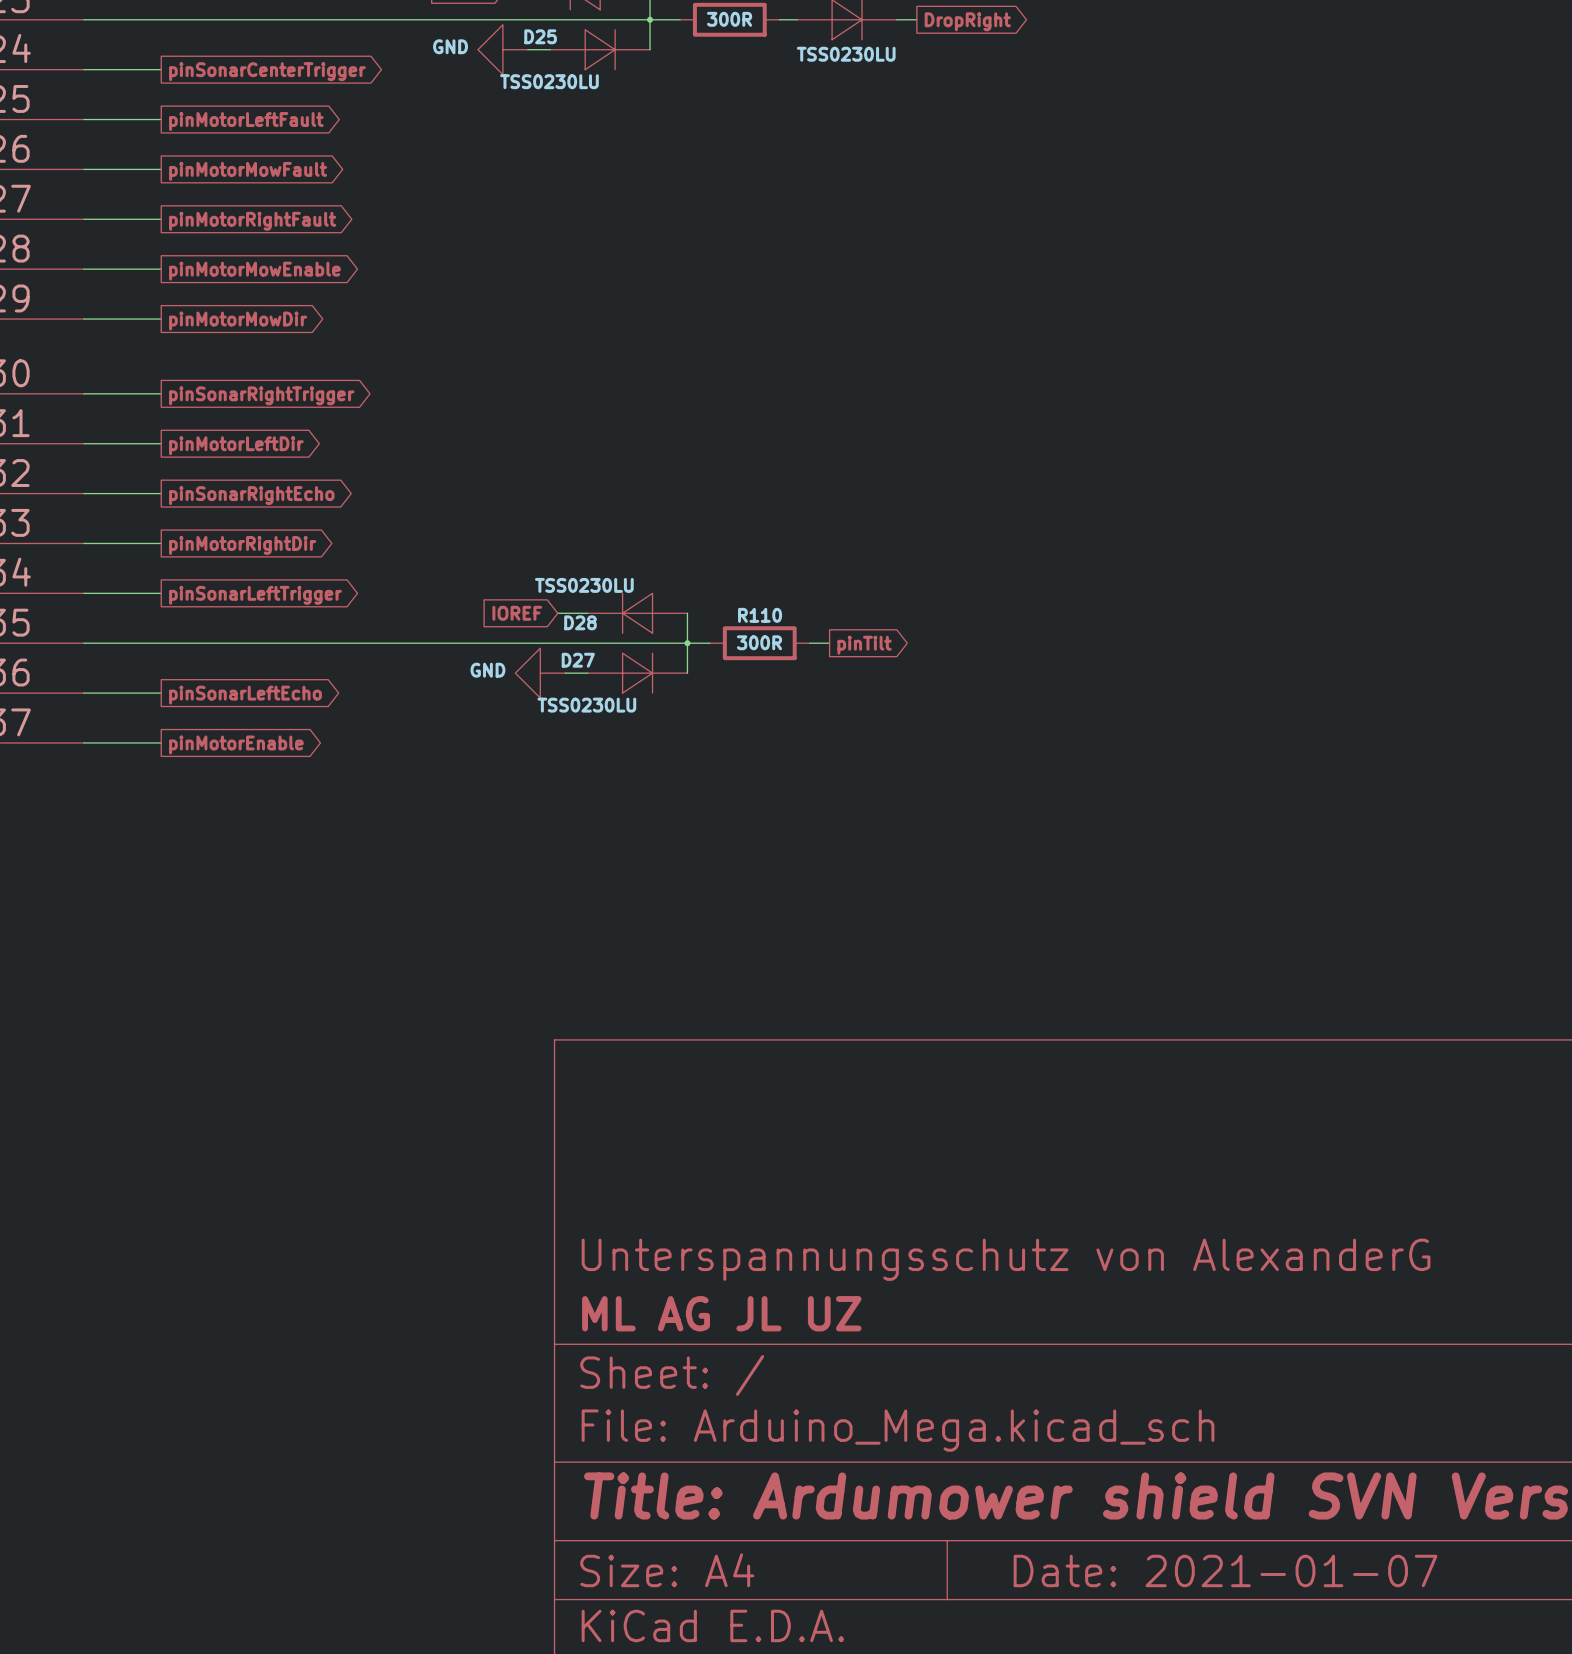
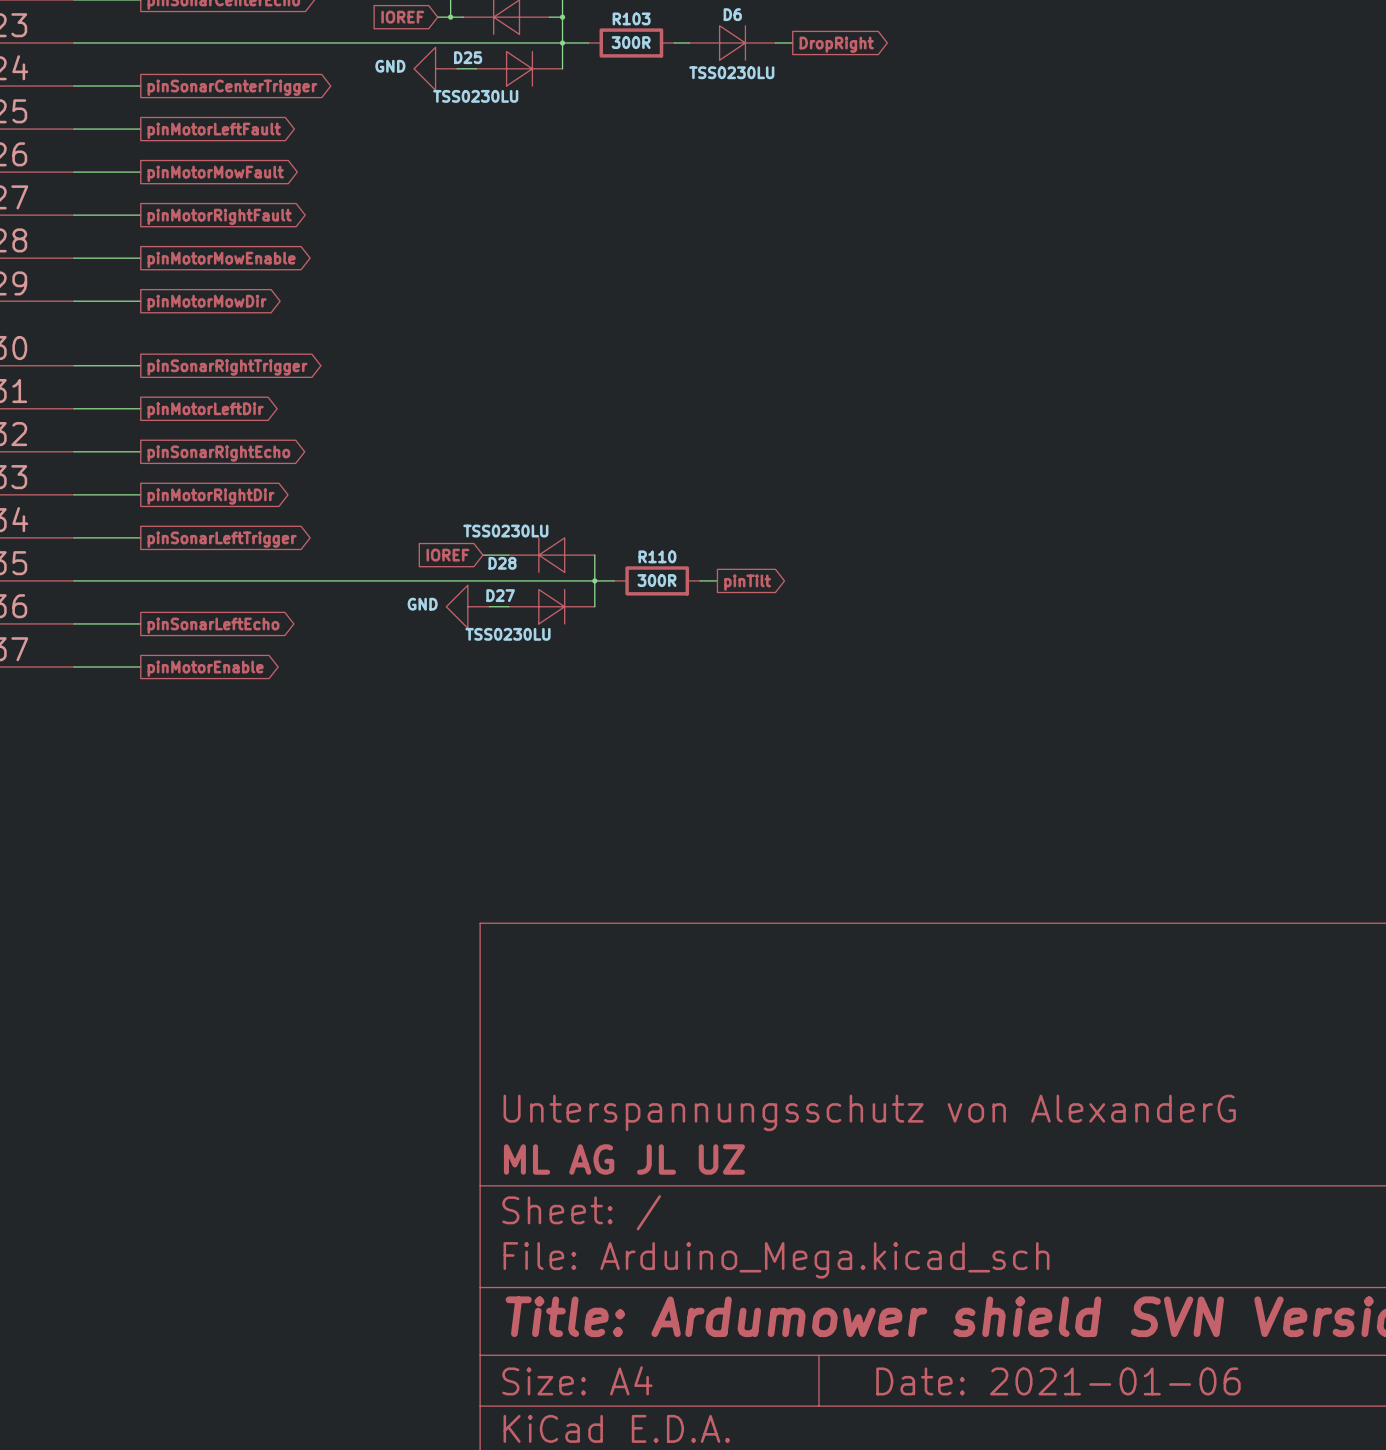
title block: Date: 2021-01-07 (1225, 1570) -> Date: 2021-01-06 (1058, 1381)

